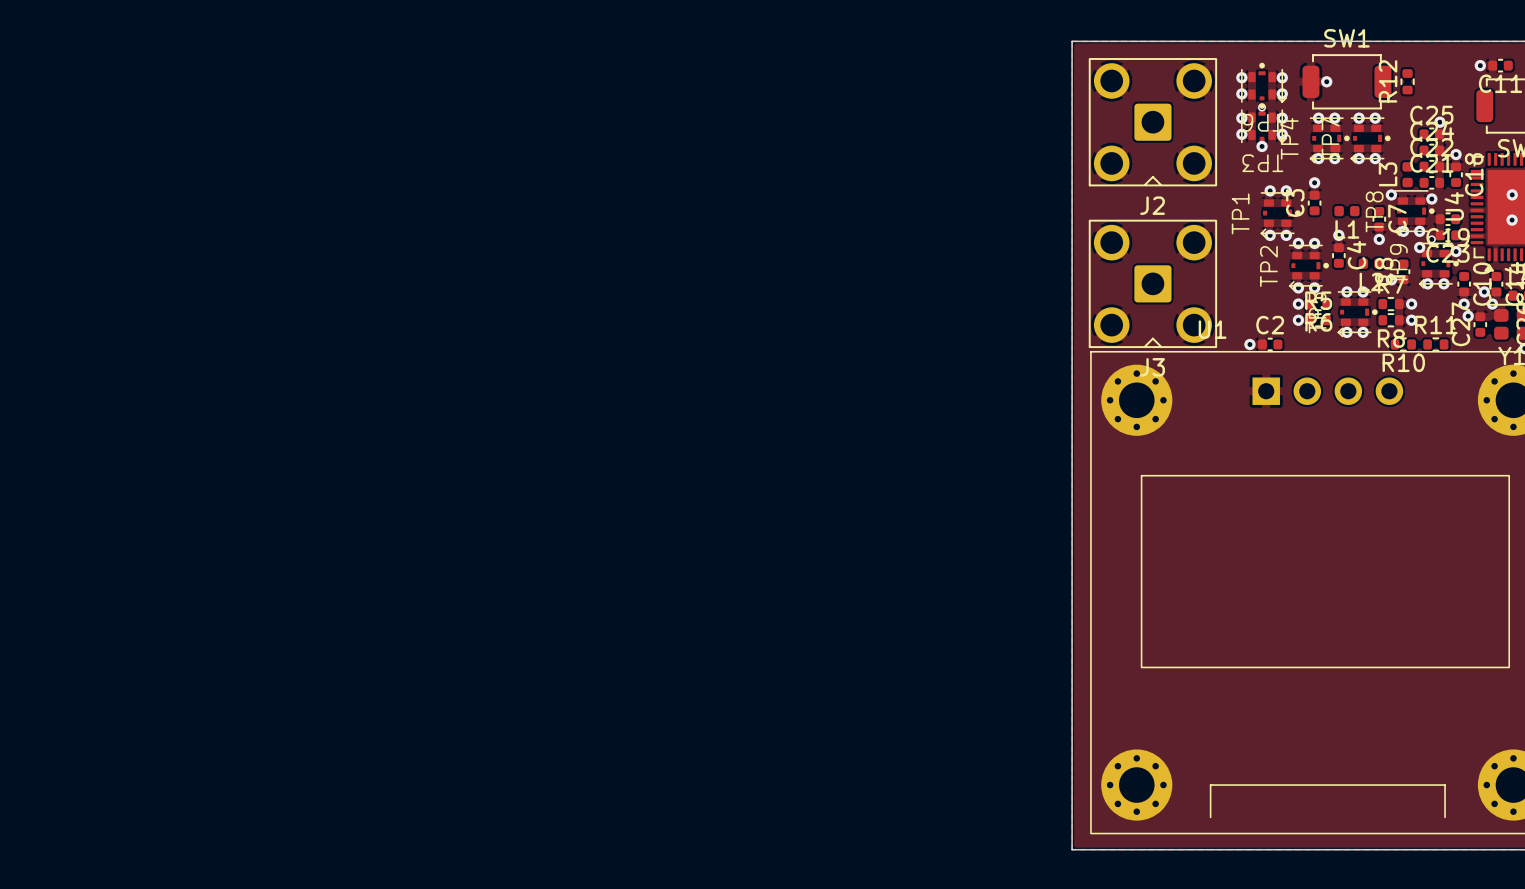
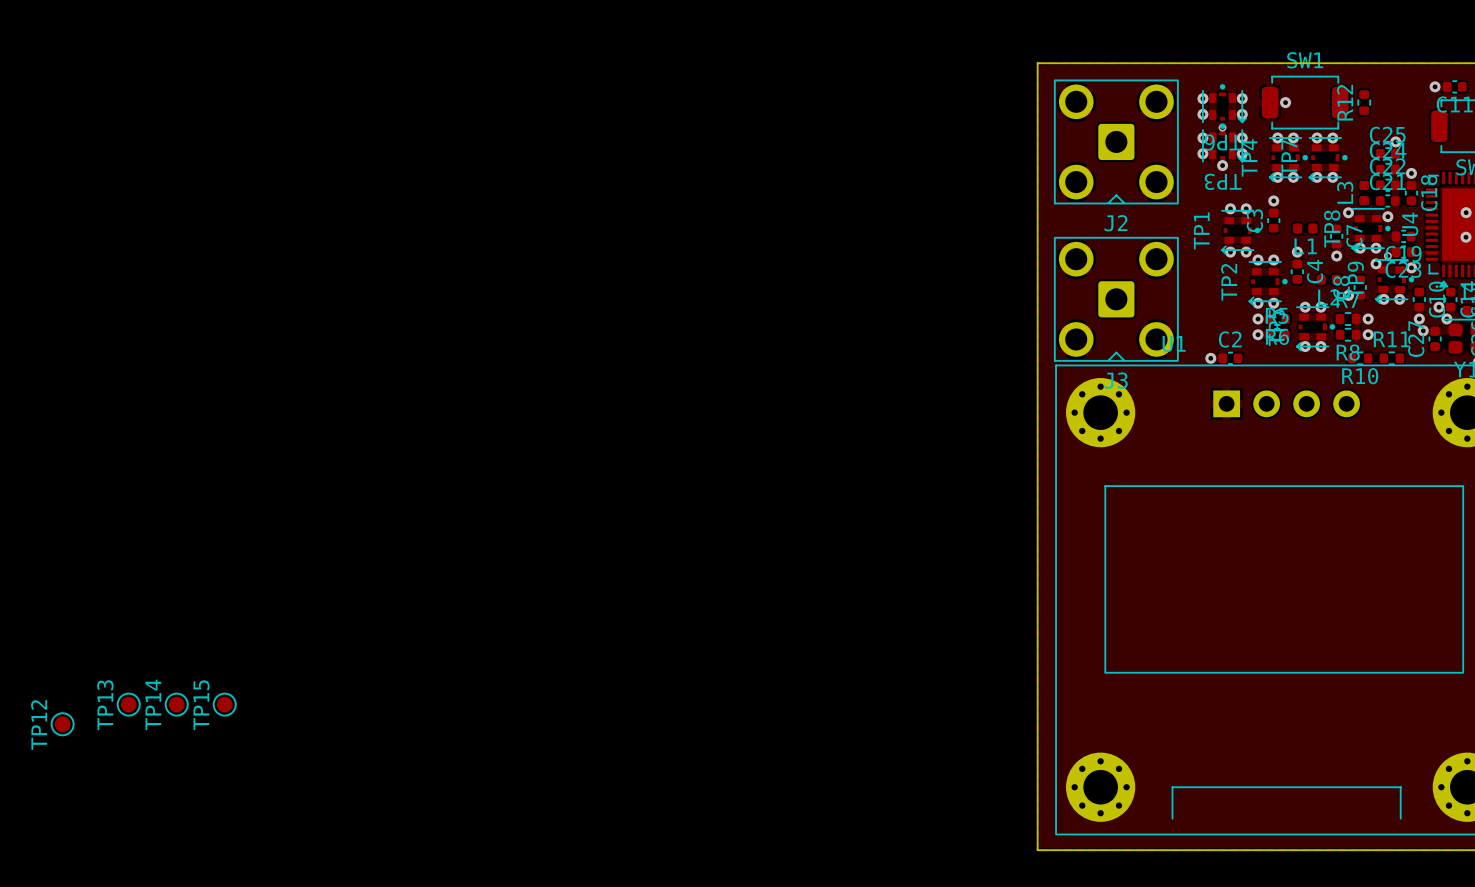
TP13: none -> (128, 704)
TP14: none -> (176, 704)
TP15: none -> (224, 704)
TP12: none -> (62, 724)

